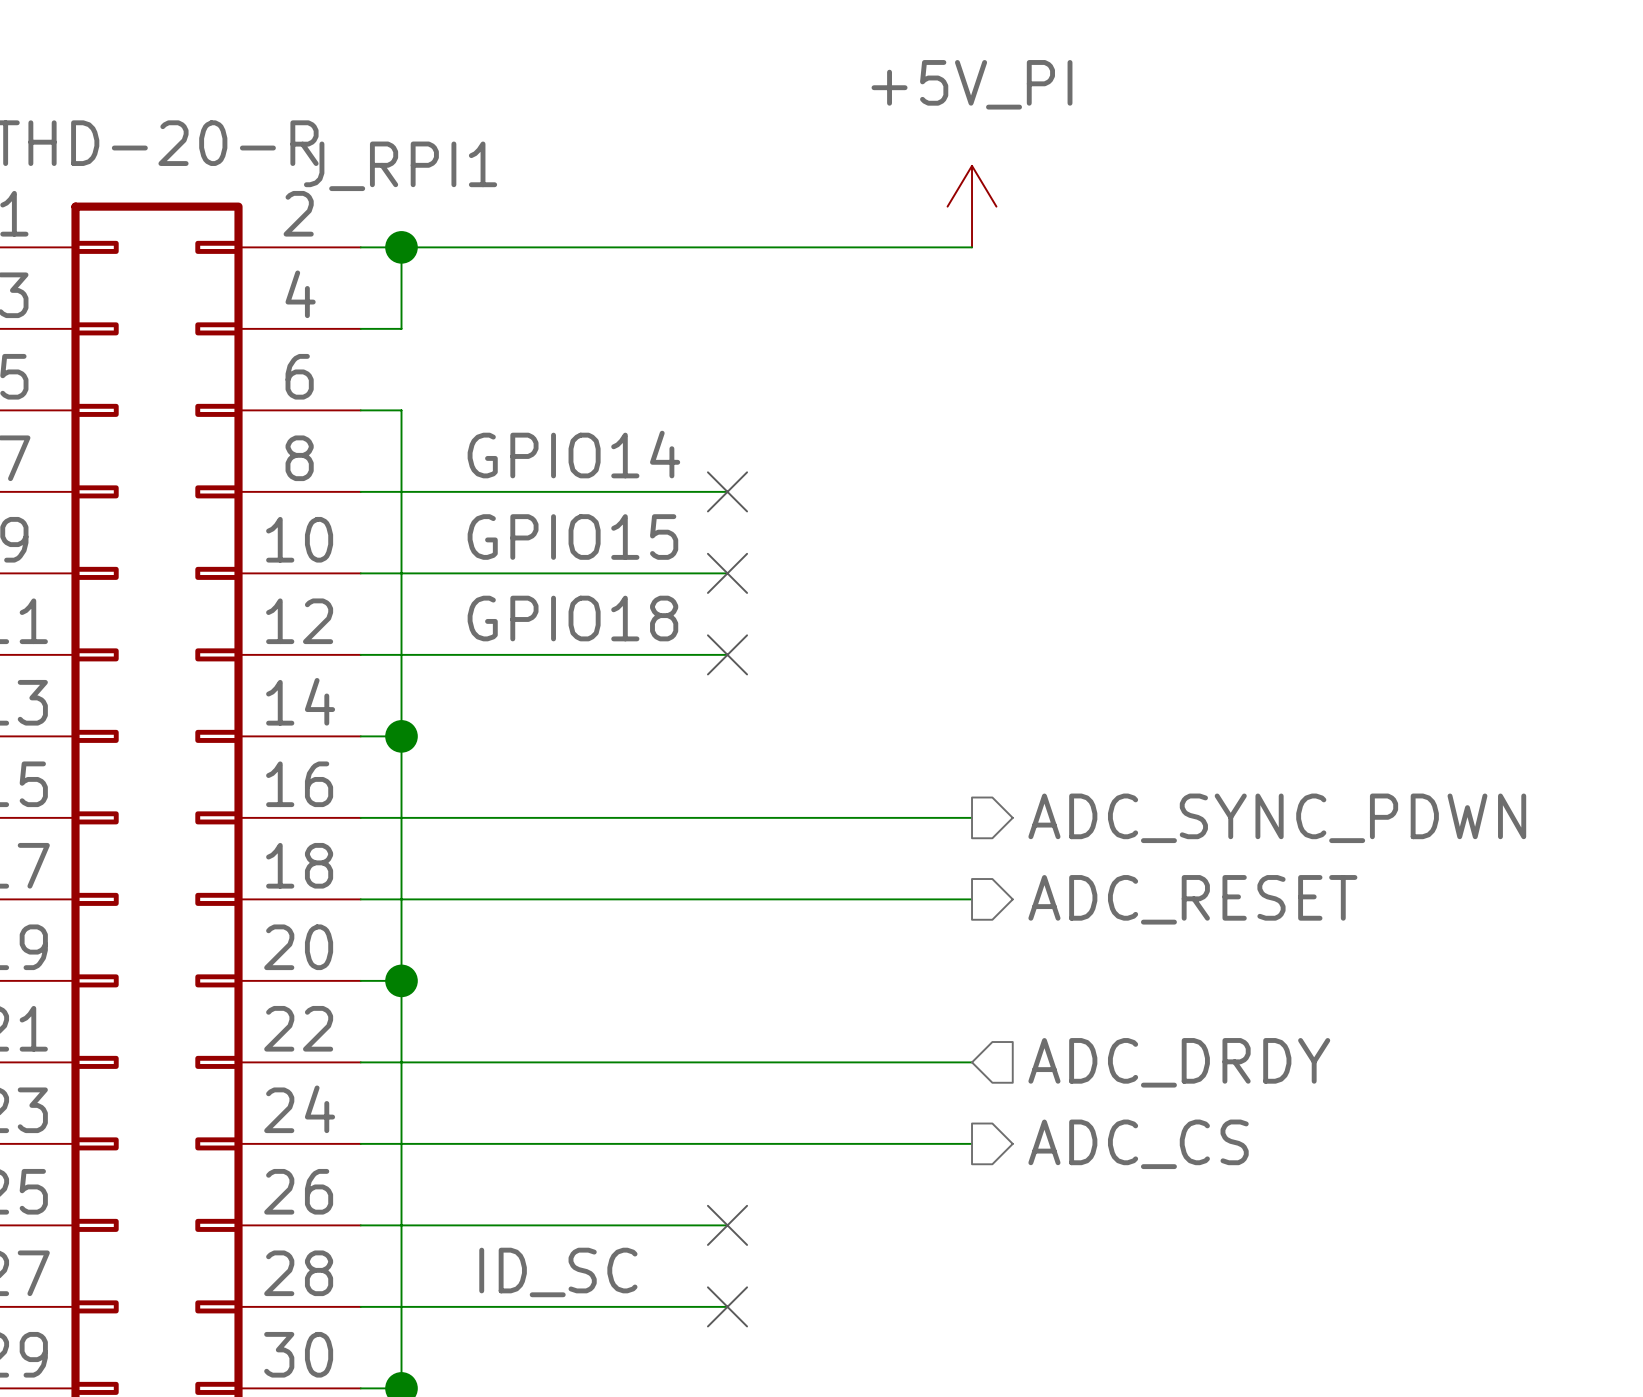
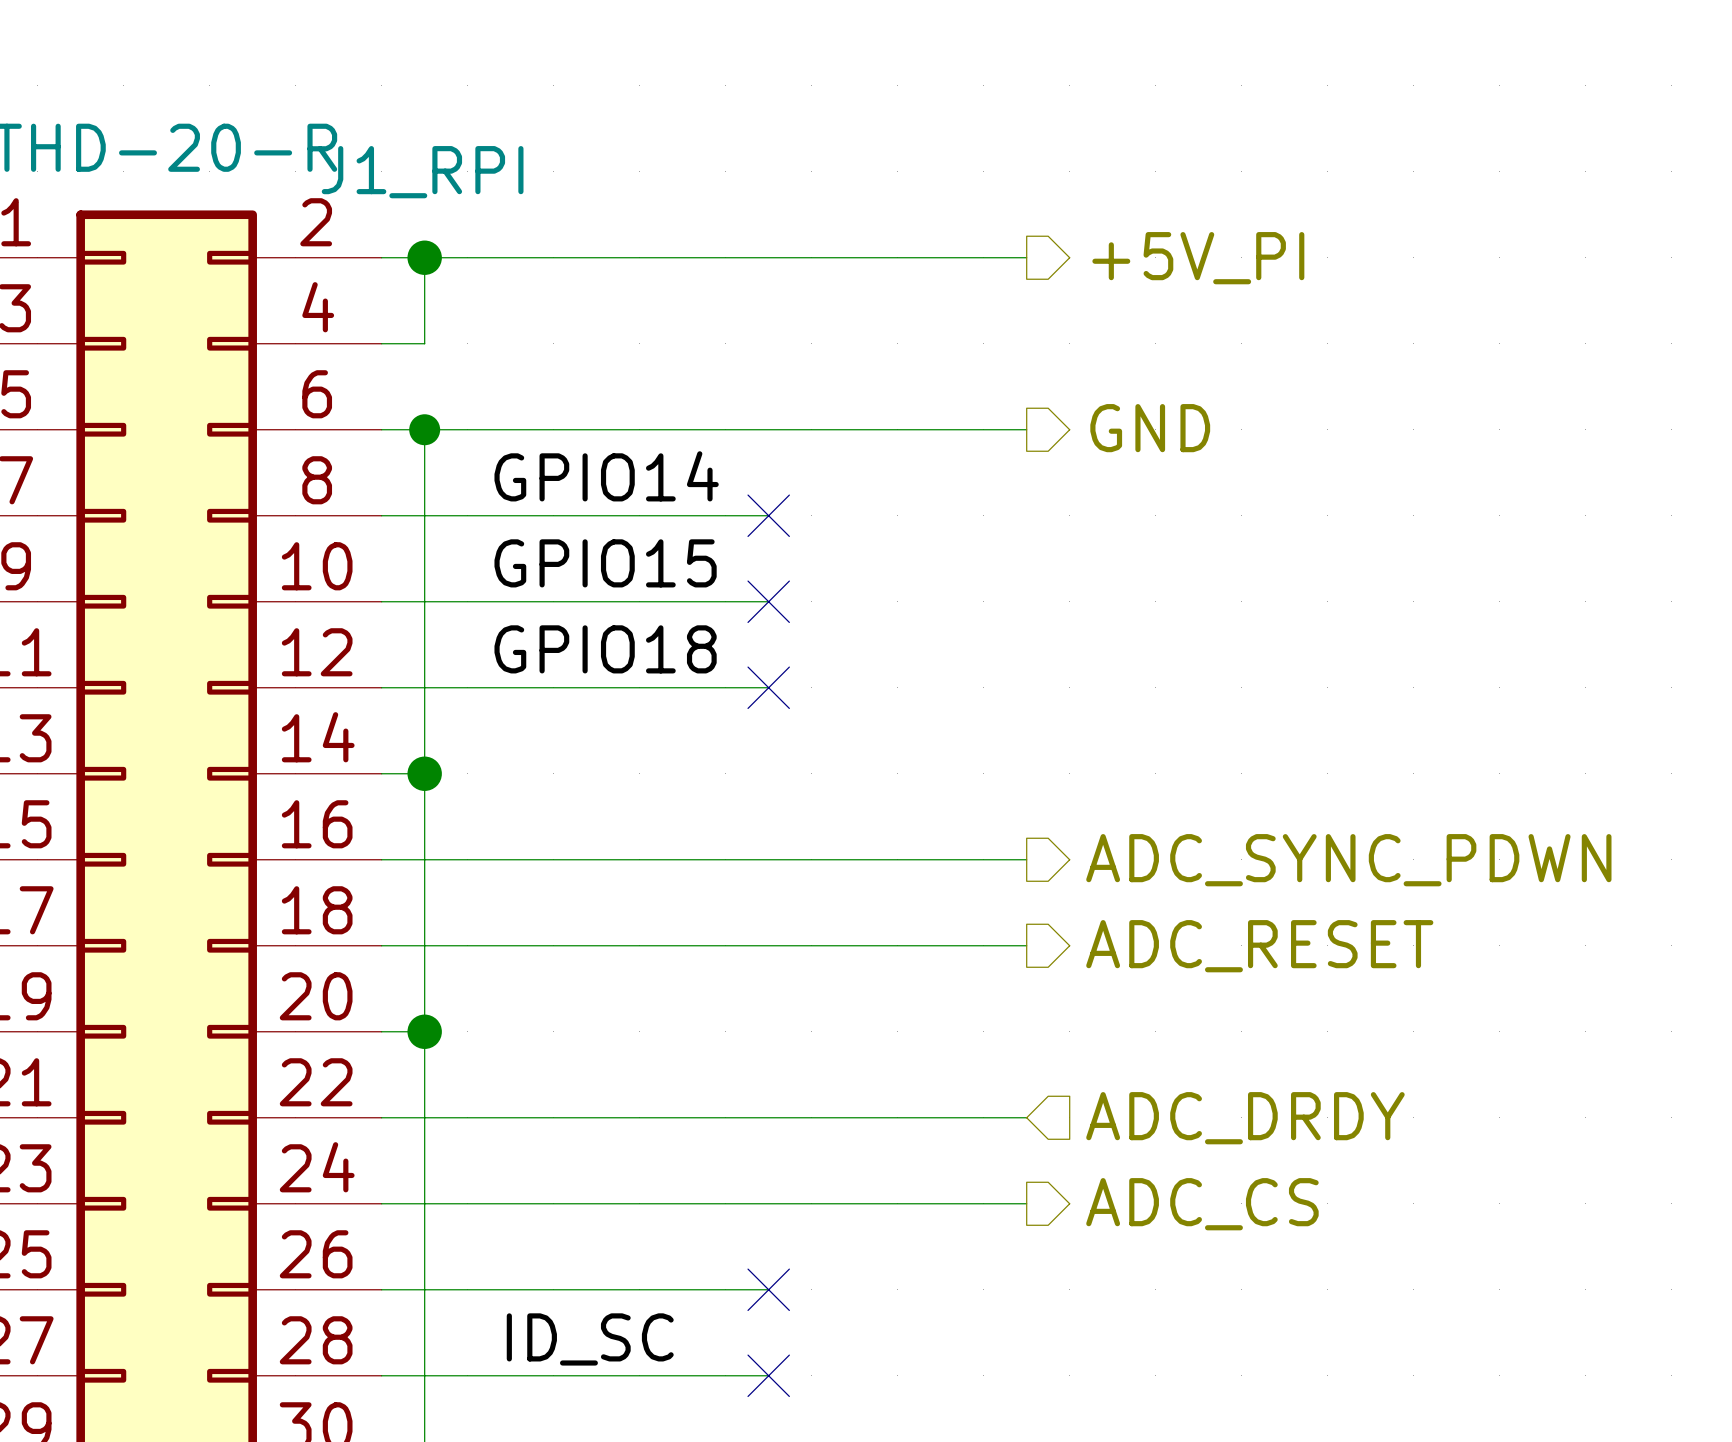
J_RPI1 name: J_RPI1 (400, 166) -> J1_RPI (422, 172)
power symbol: +5V_PI (972, 206) -> none
hierarchical label: none -> +5V_PI (1198, 258)
hierarchical label: none -> GND (1150, 428)
wire: none -> (424, 429) (1026, 429)
junction: none -> (424, 429)

